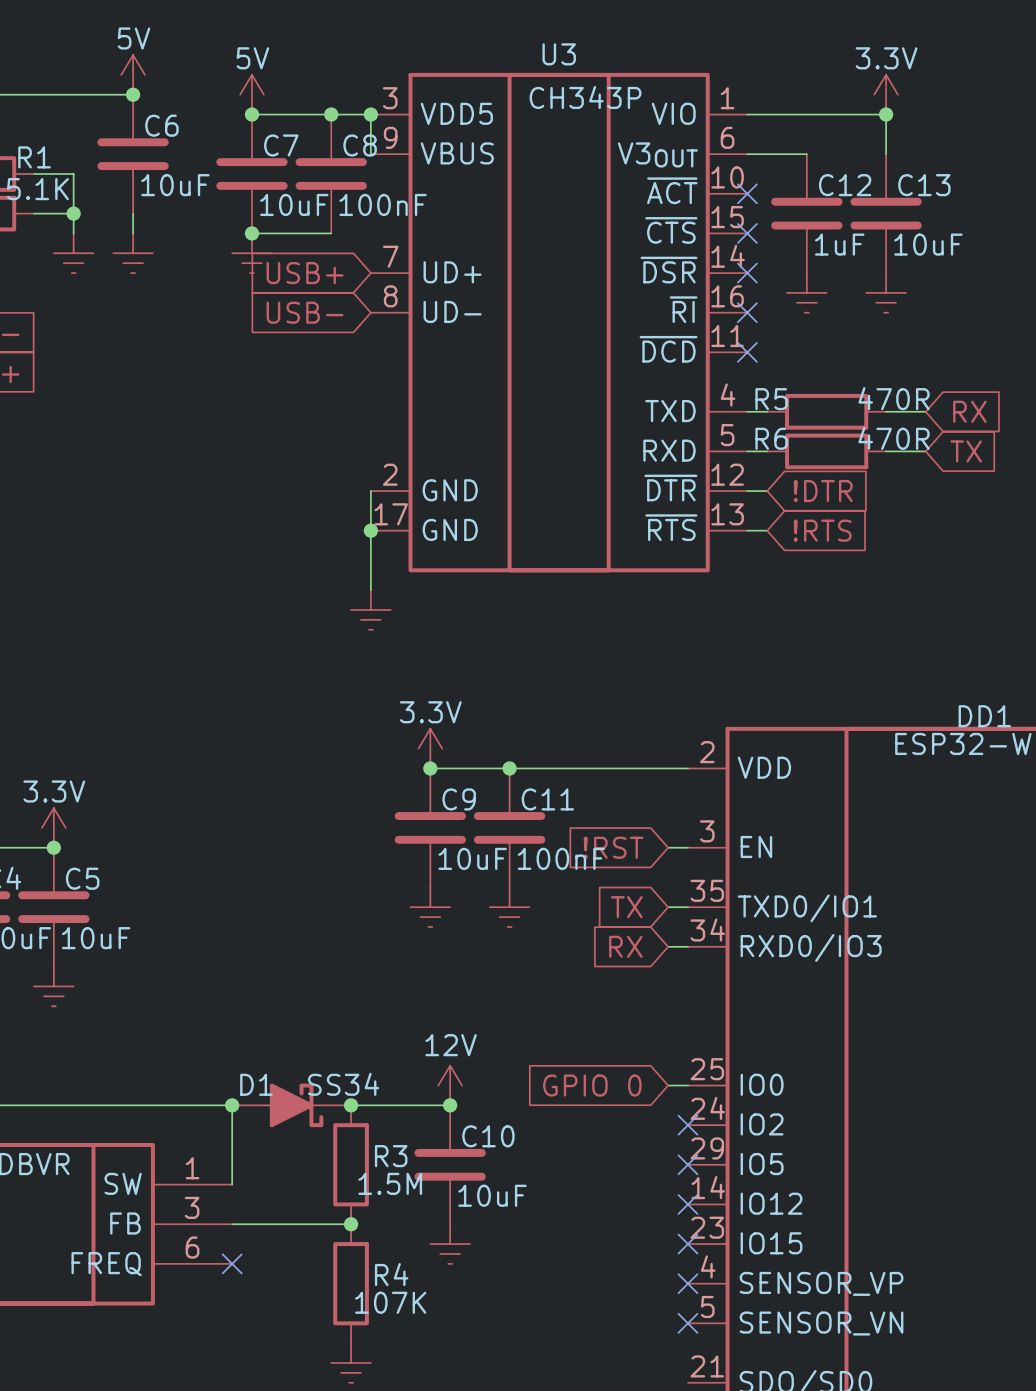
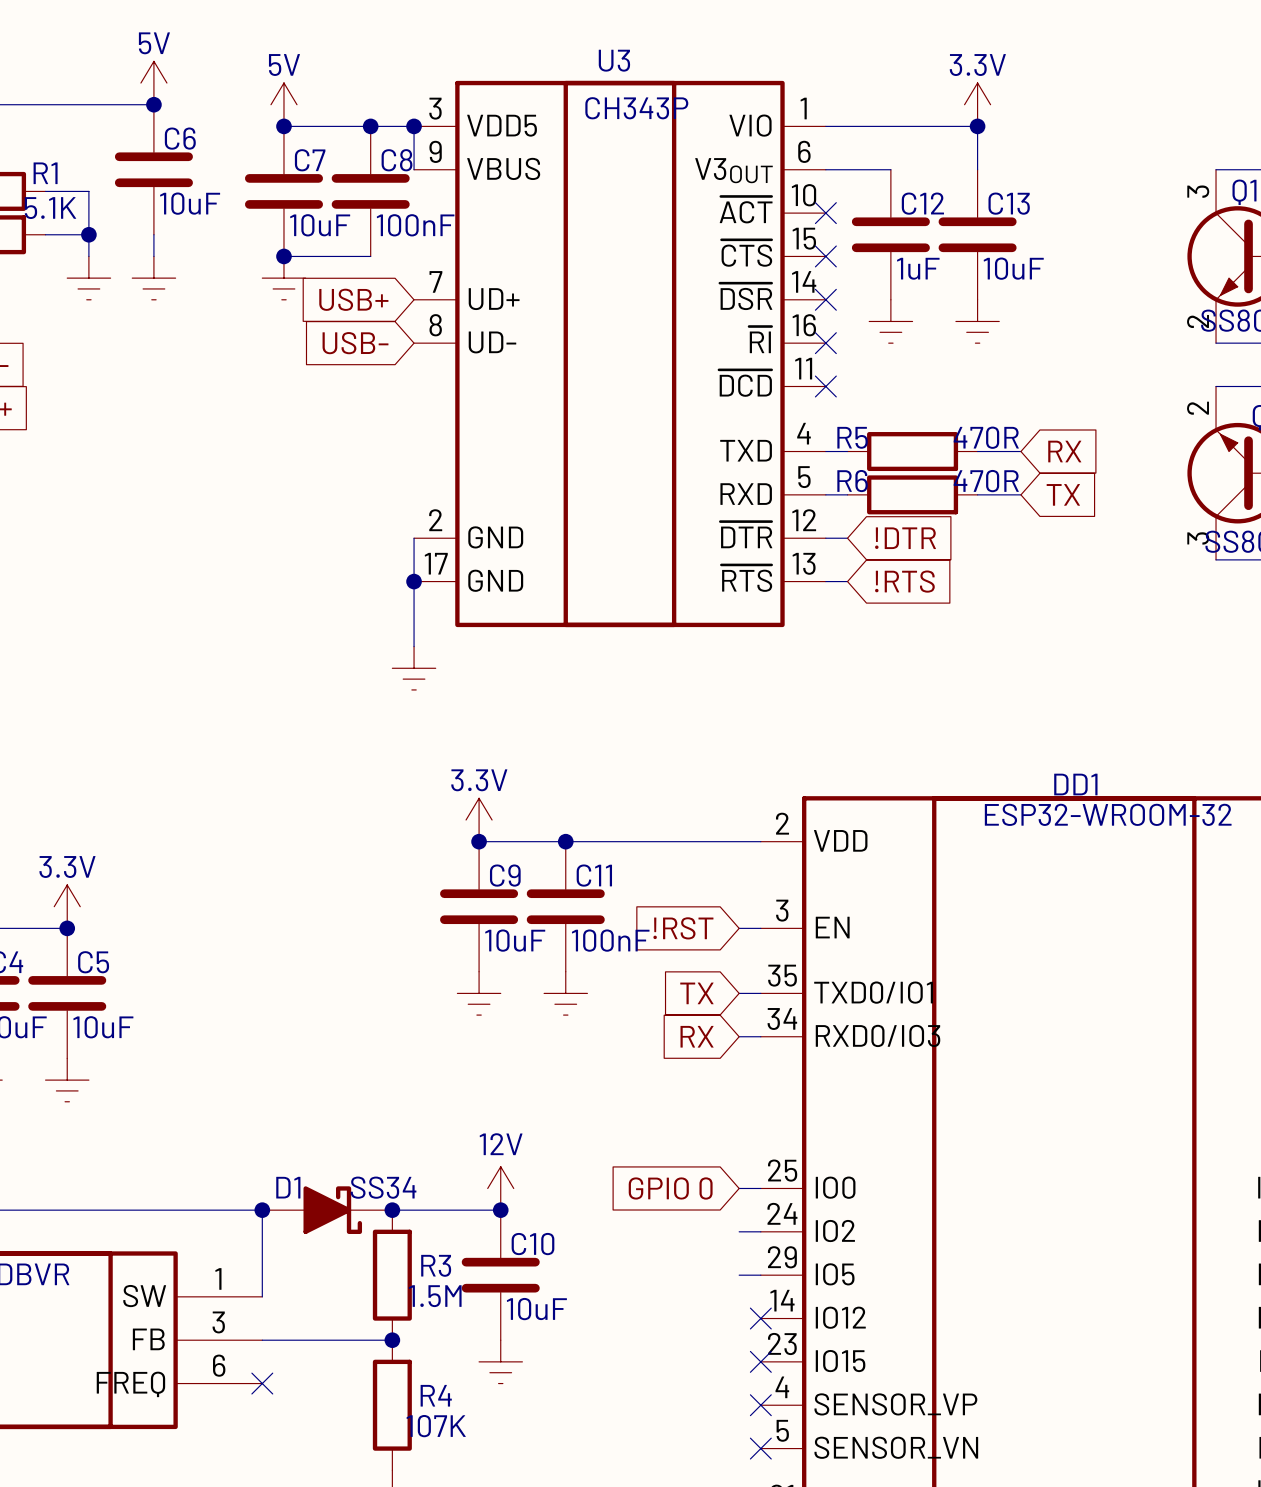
wire: none -> (739, 1231) (760, 1231)
no-connect mark: (687, 1125) -> none
wire: none -> (739, 1275) (760, 1275)
no-connect mark: (687, 1164) -> none

